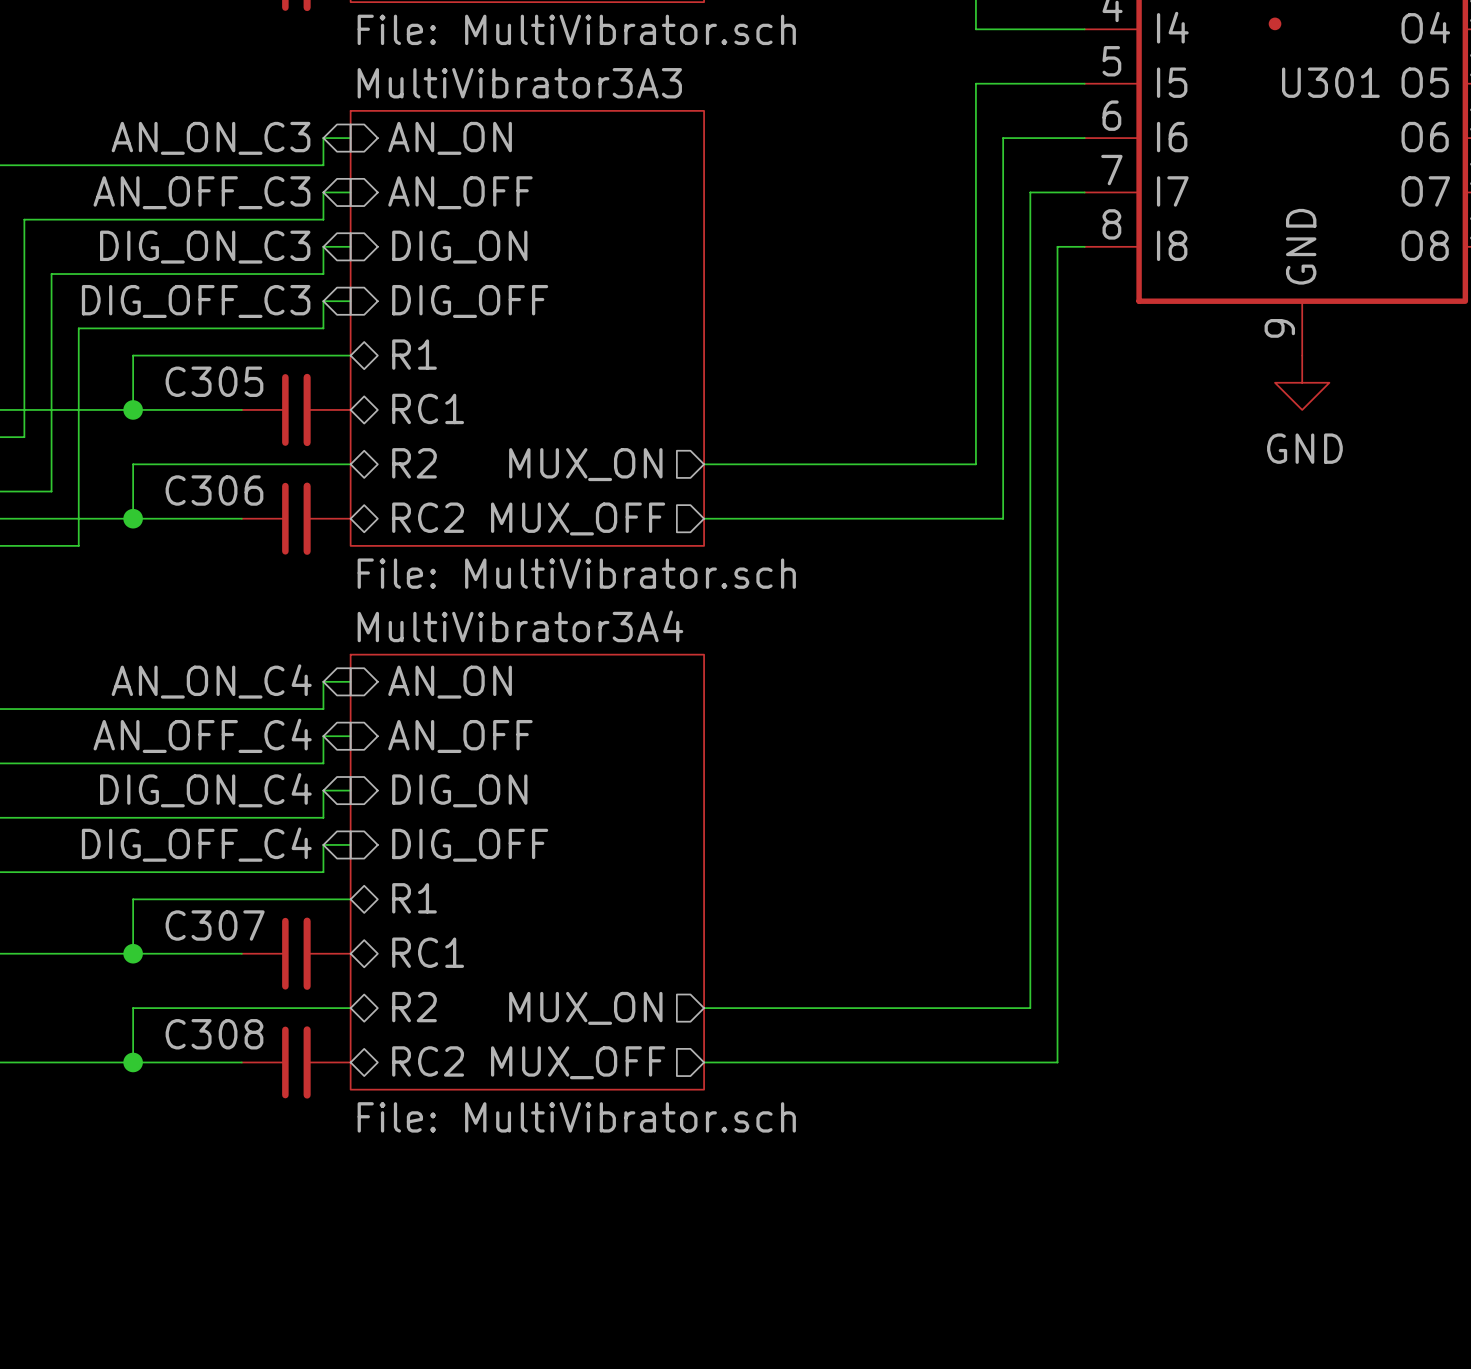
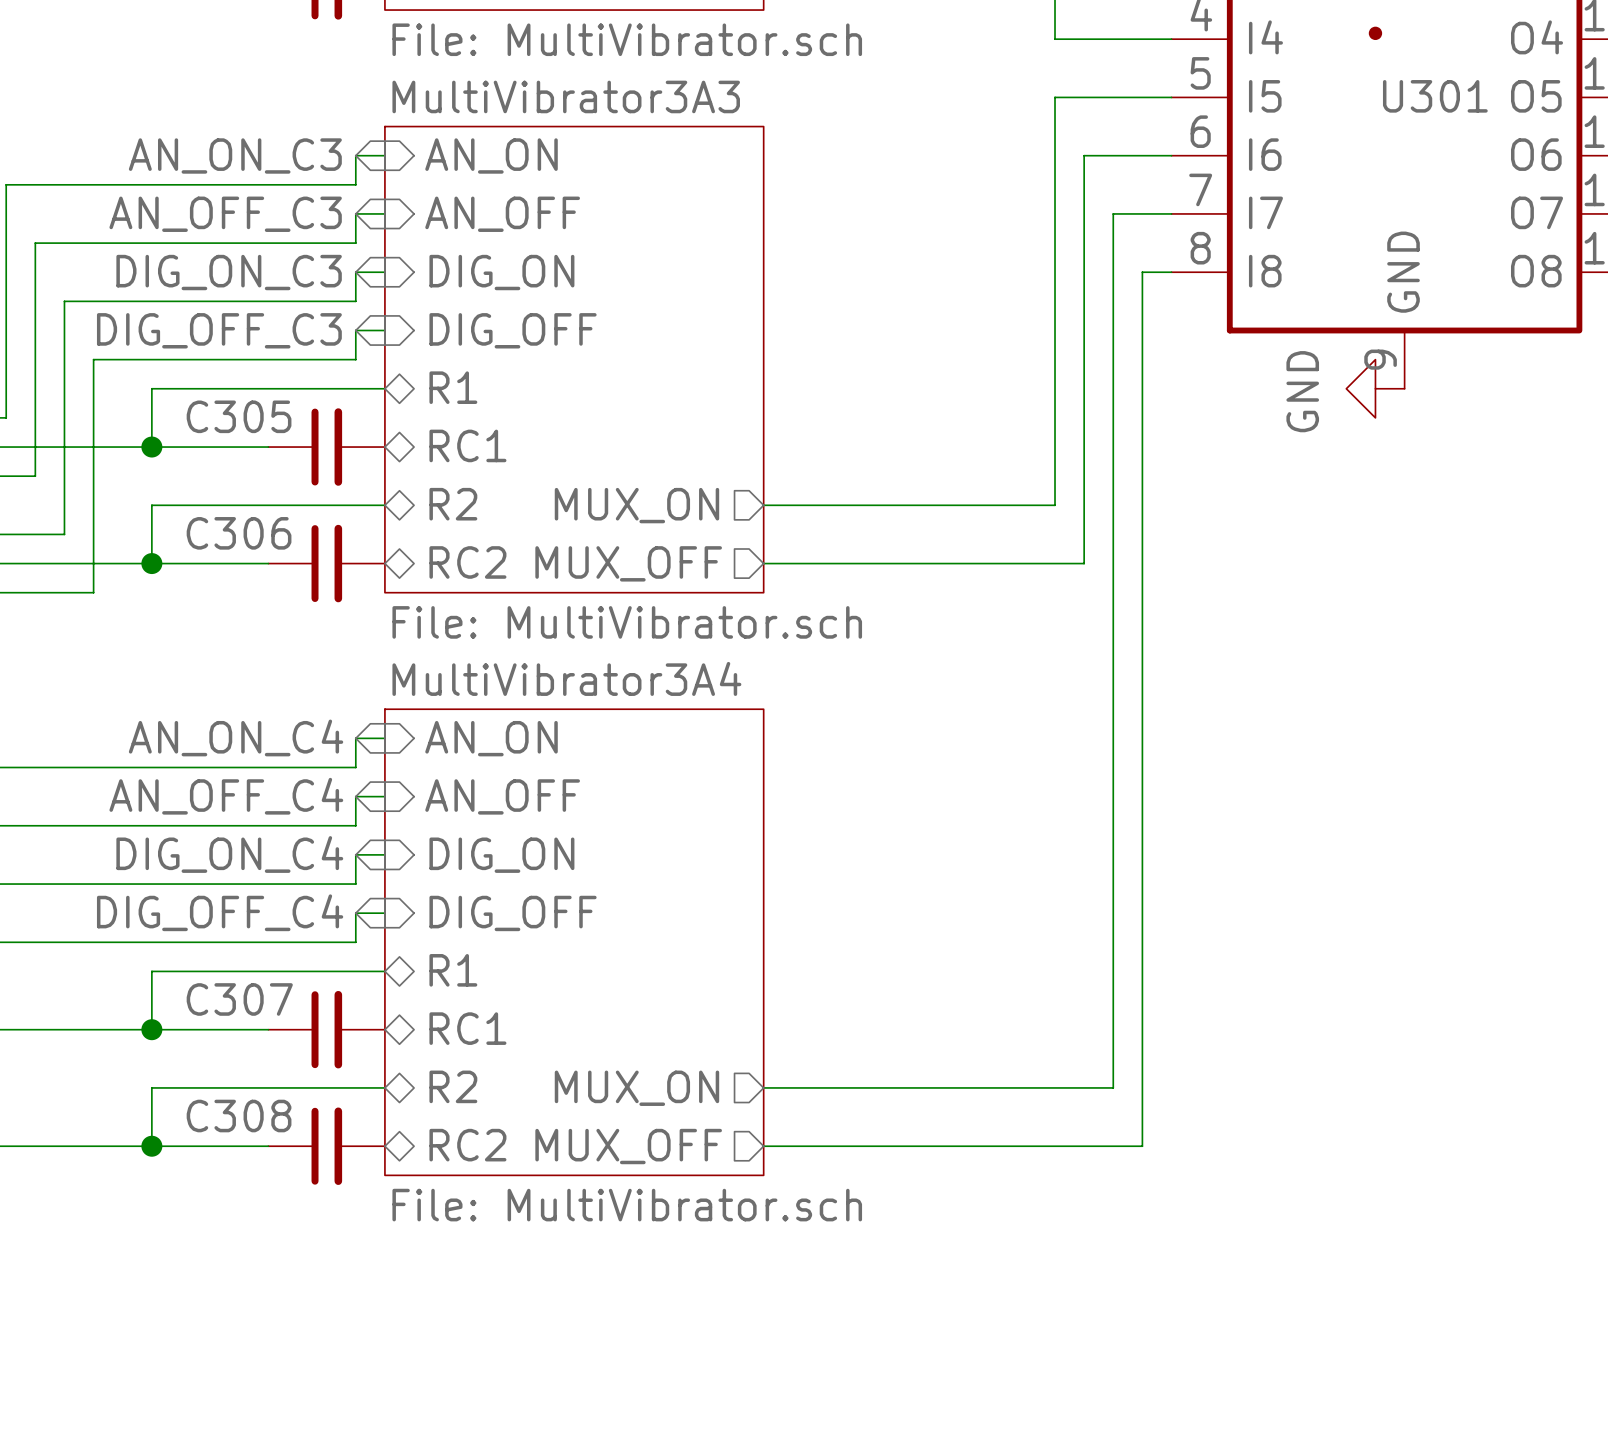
power symbol rotation: 0° (1302, 382) -> 90° clockwise (1375, 388)
power symbol position: GND (1302, 382) -> GND (1375, 388)

